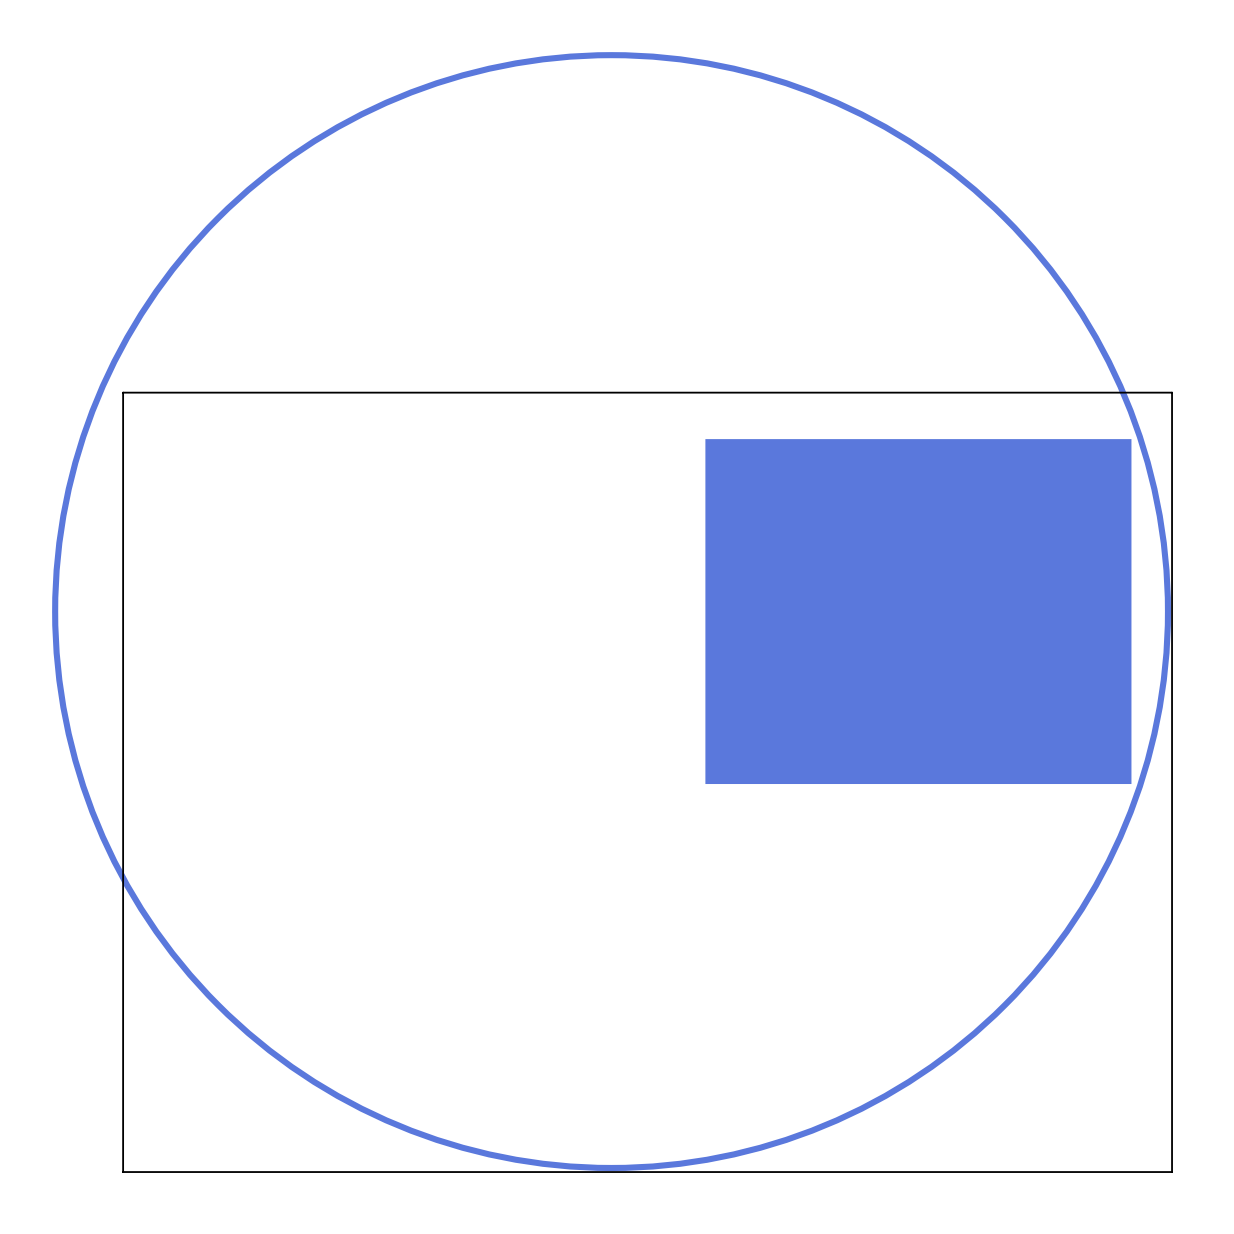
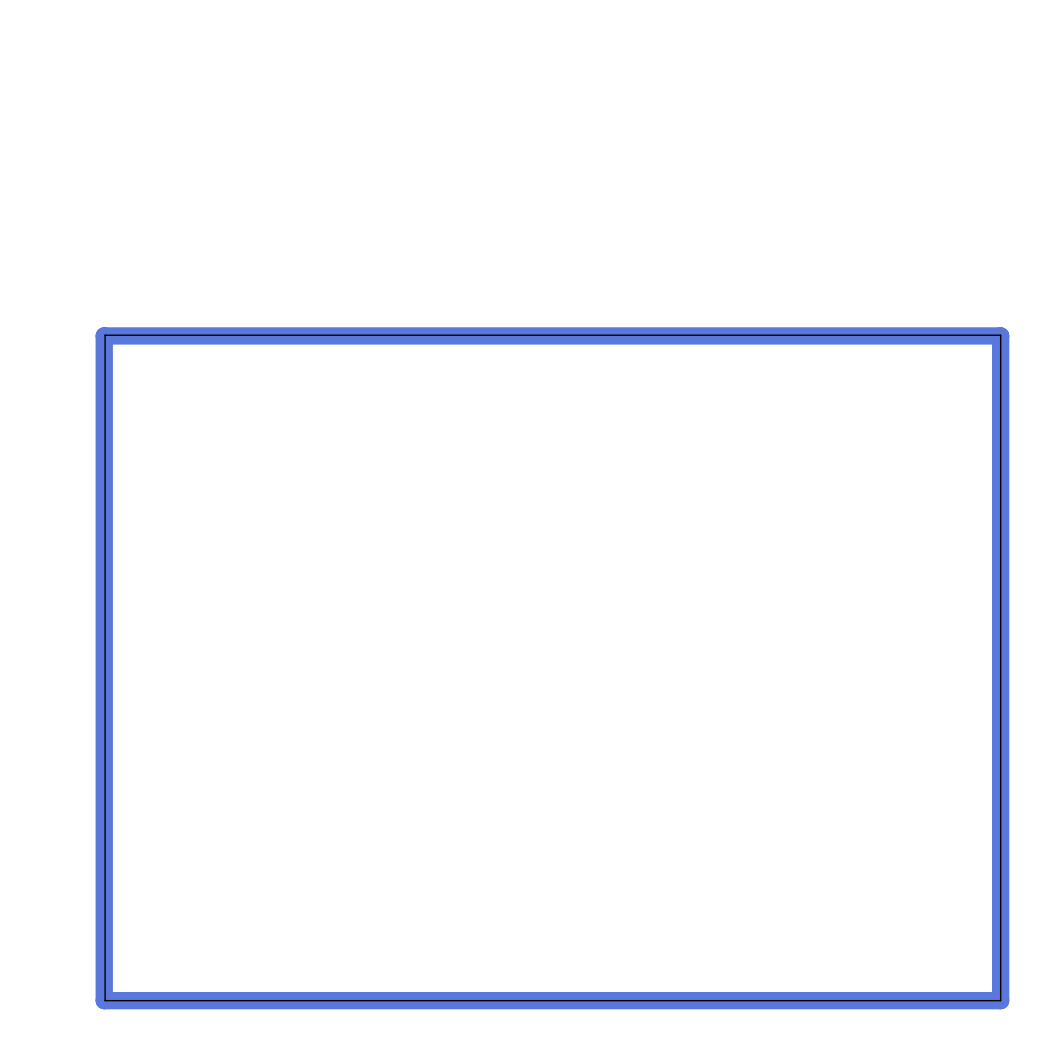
drawing: [52, 52, 1172, 1172] -> none
track: none -> (1000, 335) (1000, 1000) (104, 1000) (104, 335) (1000, 335)

